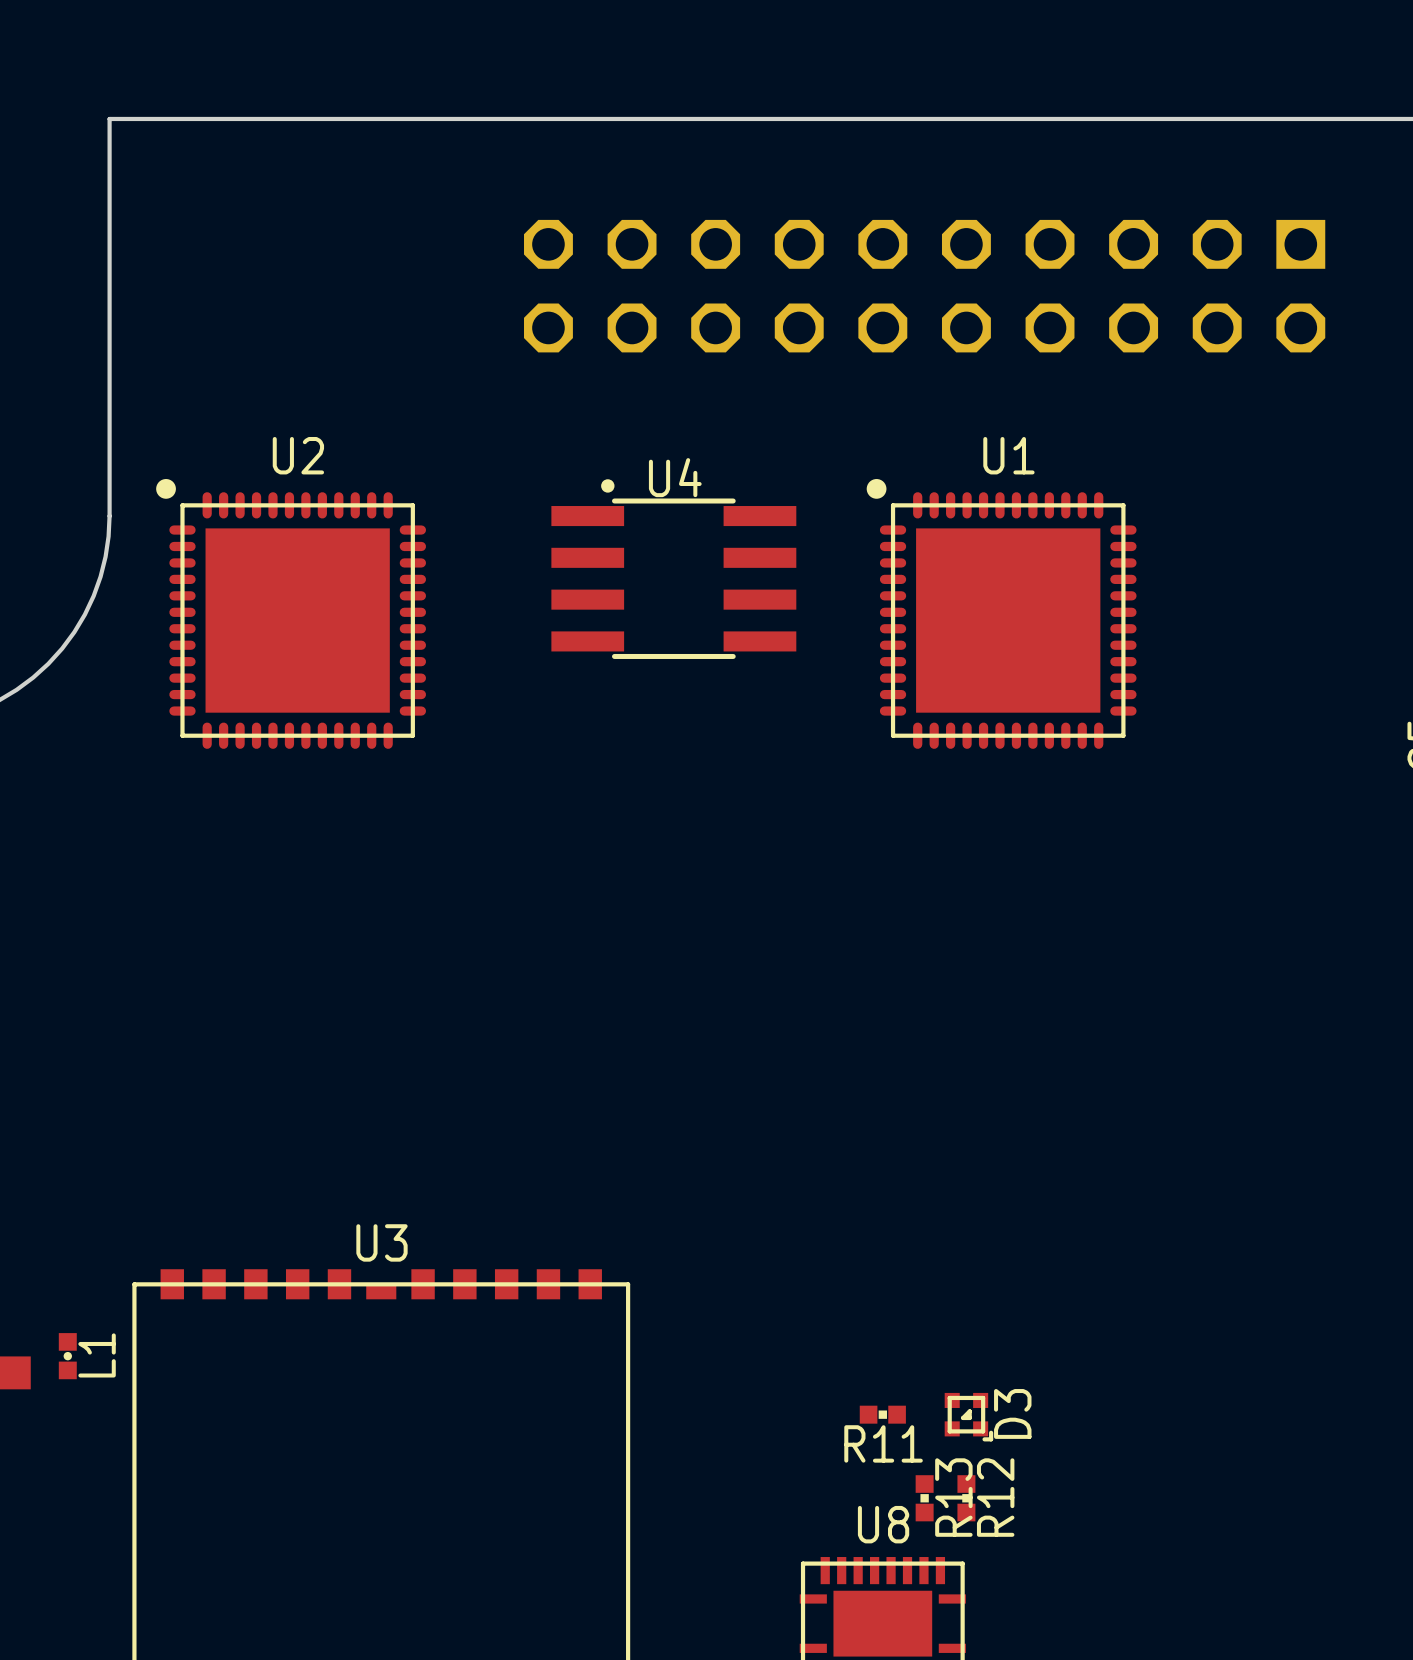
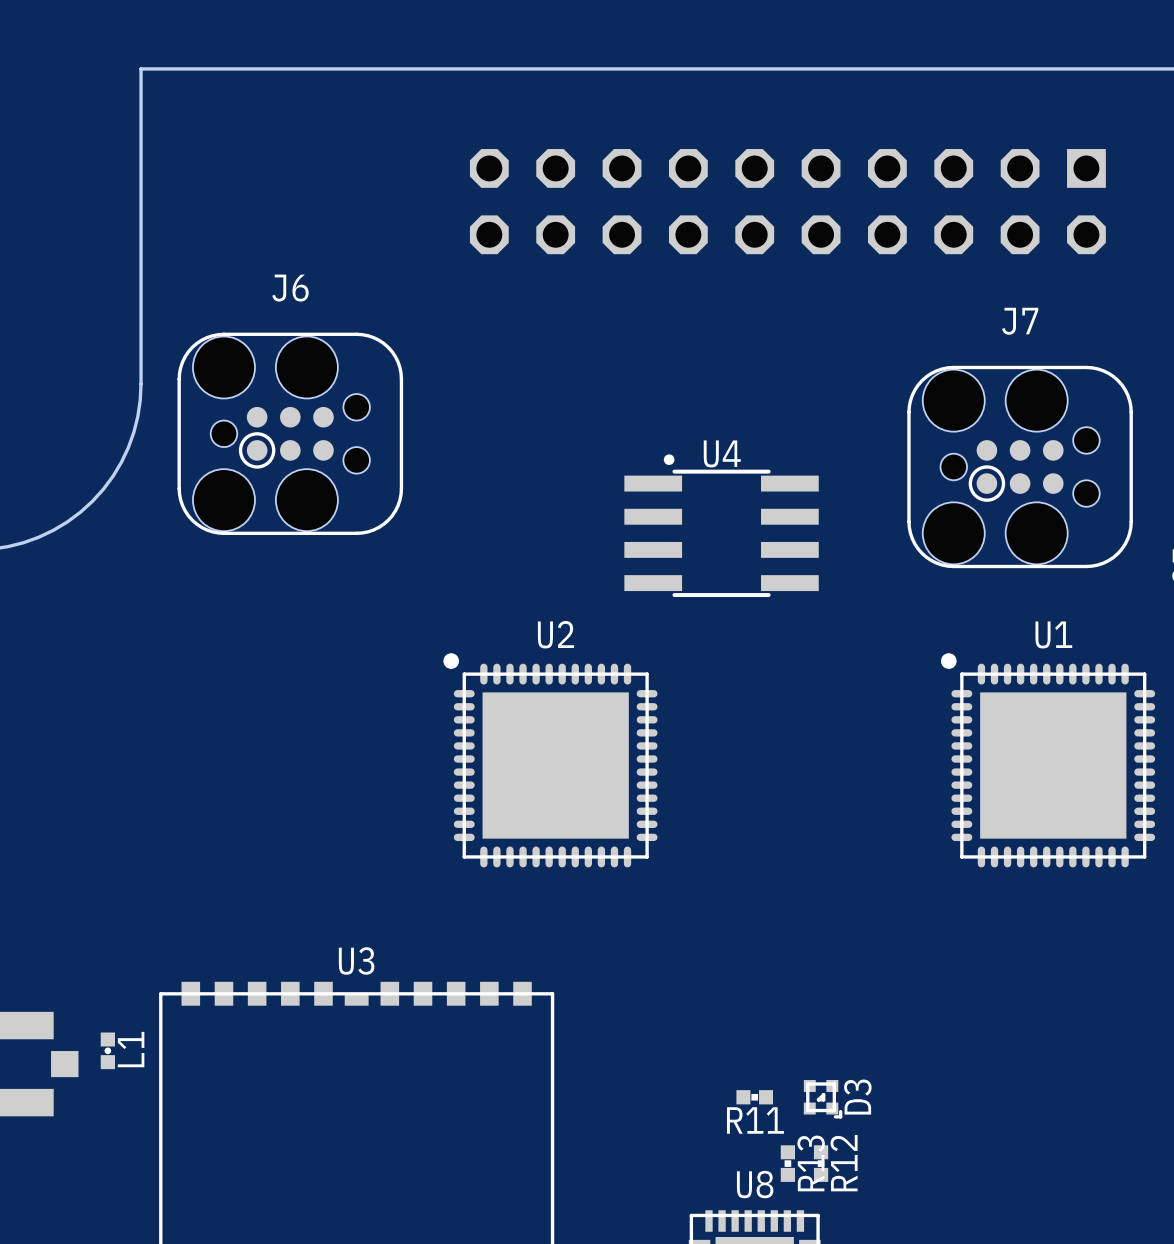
U4 position: (673, 569) -> (721, 525)
J6: none -> (290, 433)
U2 position: (291, 613) -> (550, 760)
U1 position: (1001, 613) -> (1048, 760)
J7: none -> (1020, 466)

